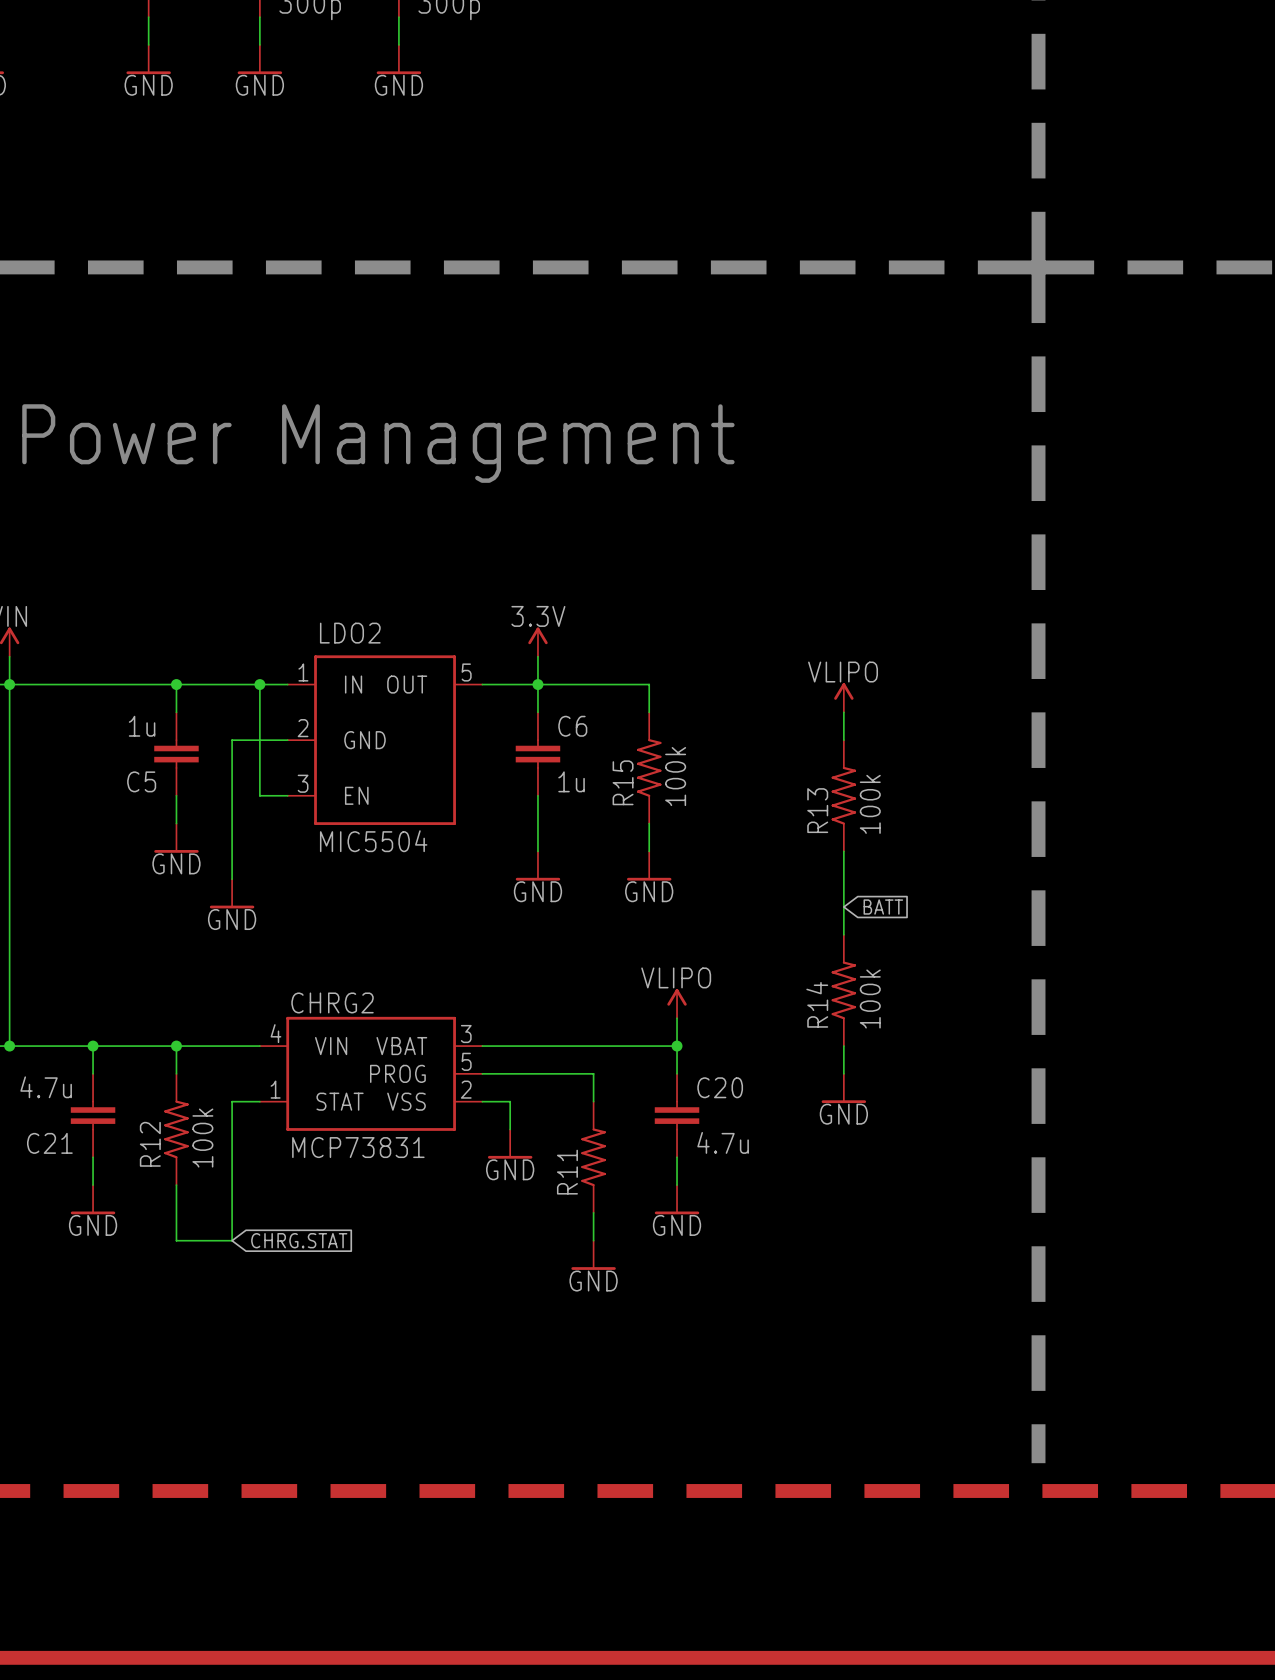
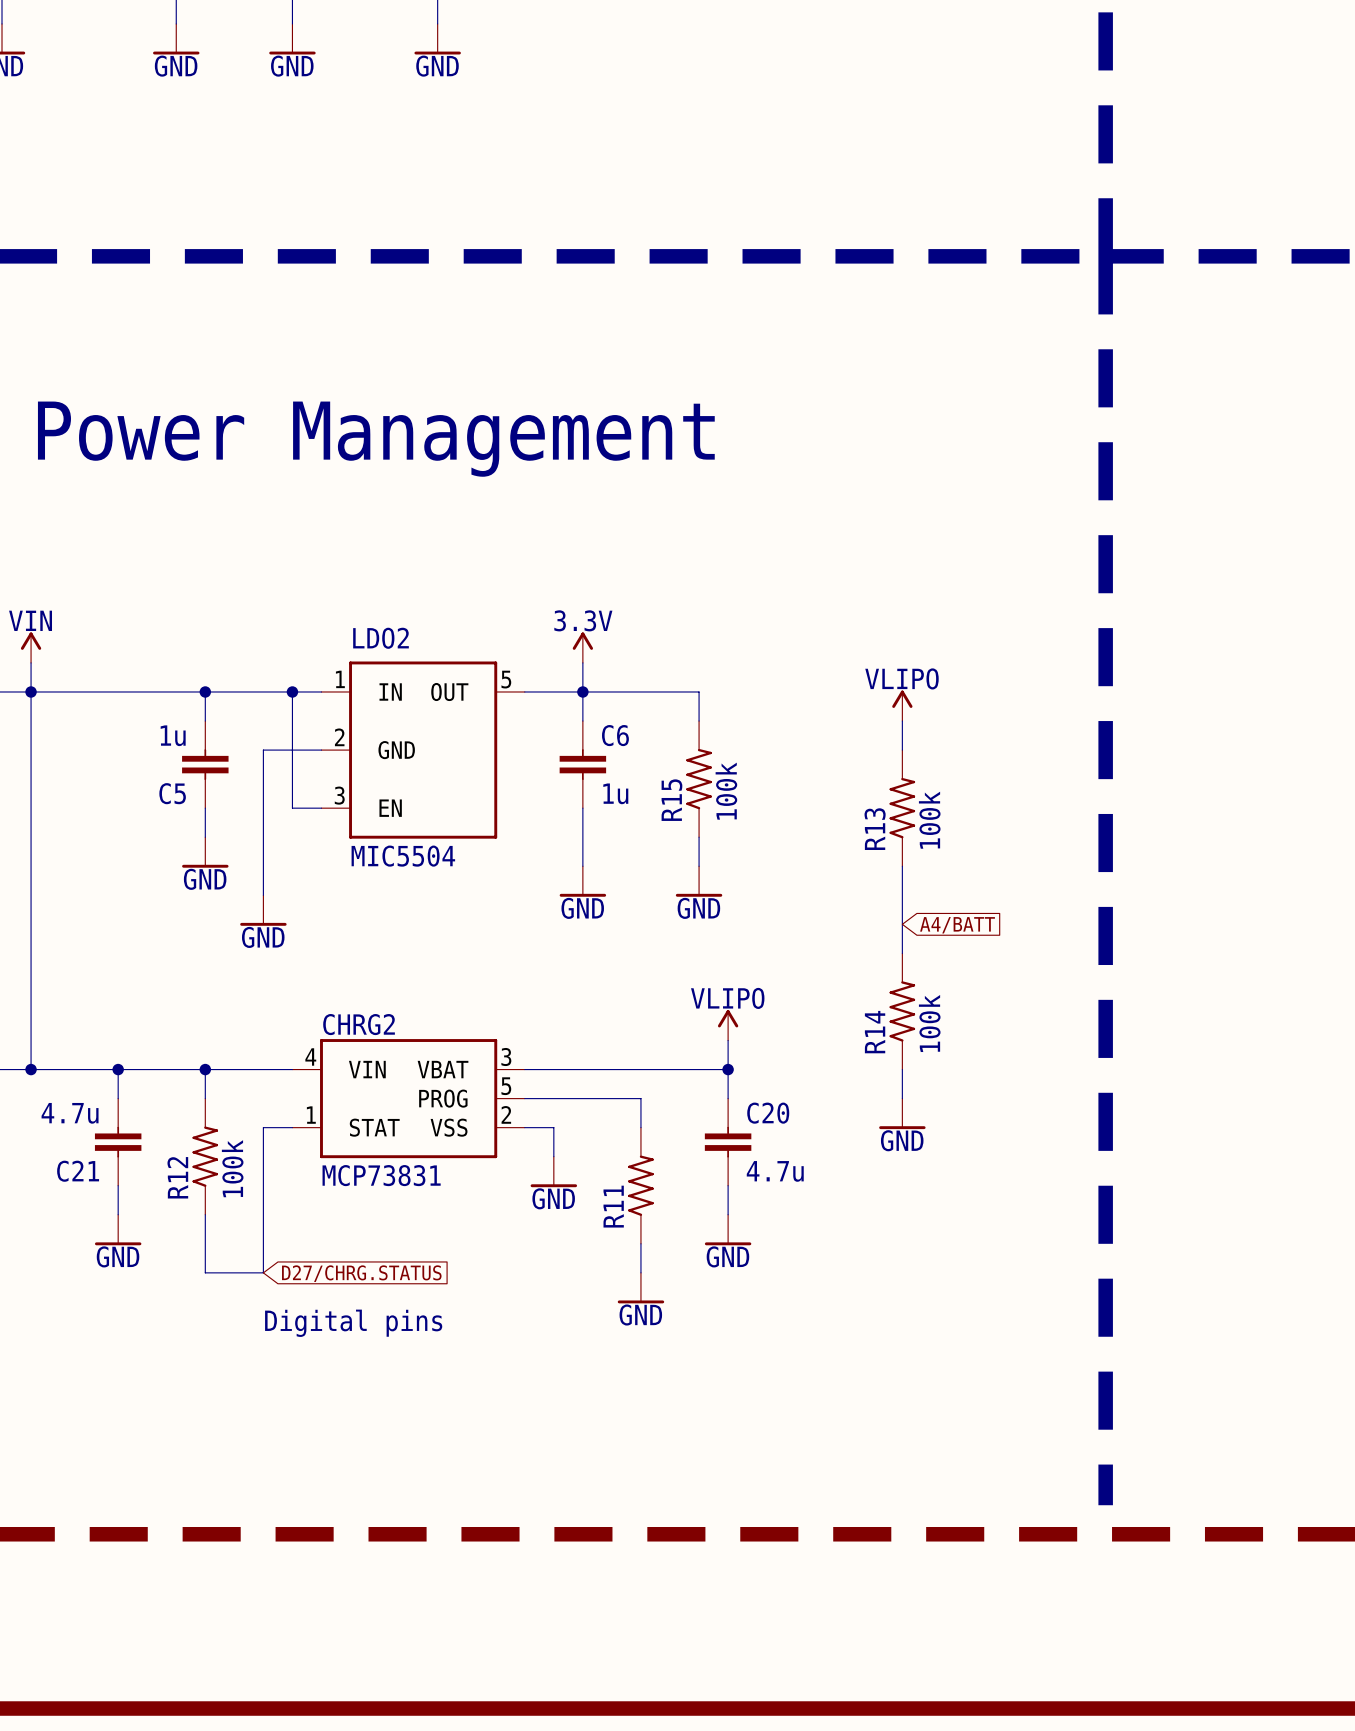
global label: BATT (883, 907) -> A4/BATT (957, 925)
global label: CHRG.STAT (299, 1240) -> D27/CHRG.STATUS (361, 1273)
text: none -> Digital pins (353, 1323)

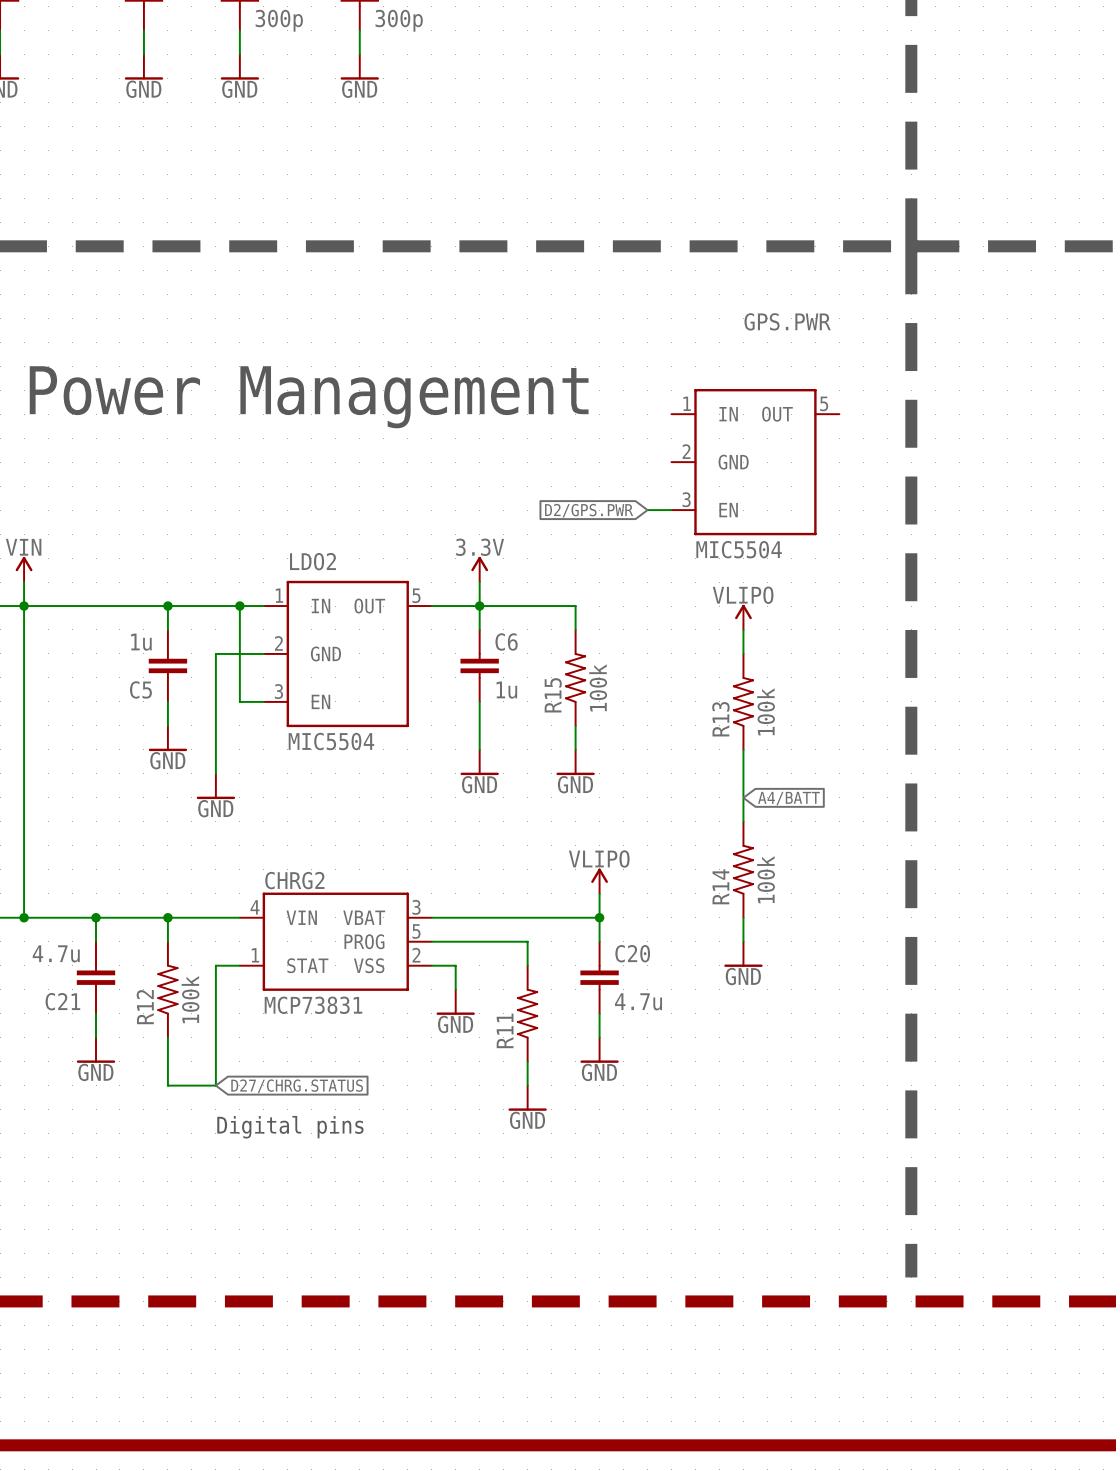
GPS.PWR: none -> MIC5504 (755, 462)
wire: none -> (647, 510) (671, 510)
global label: none -> D2/GPS.PWR (589, 510)

